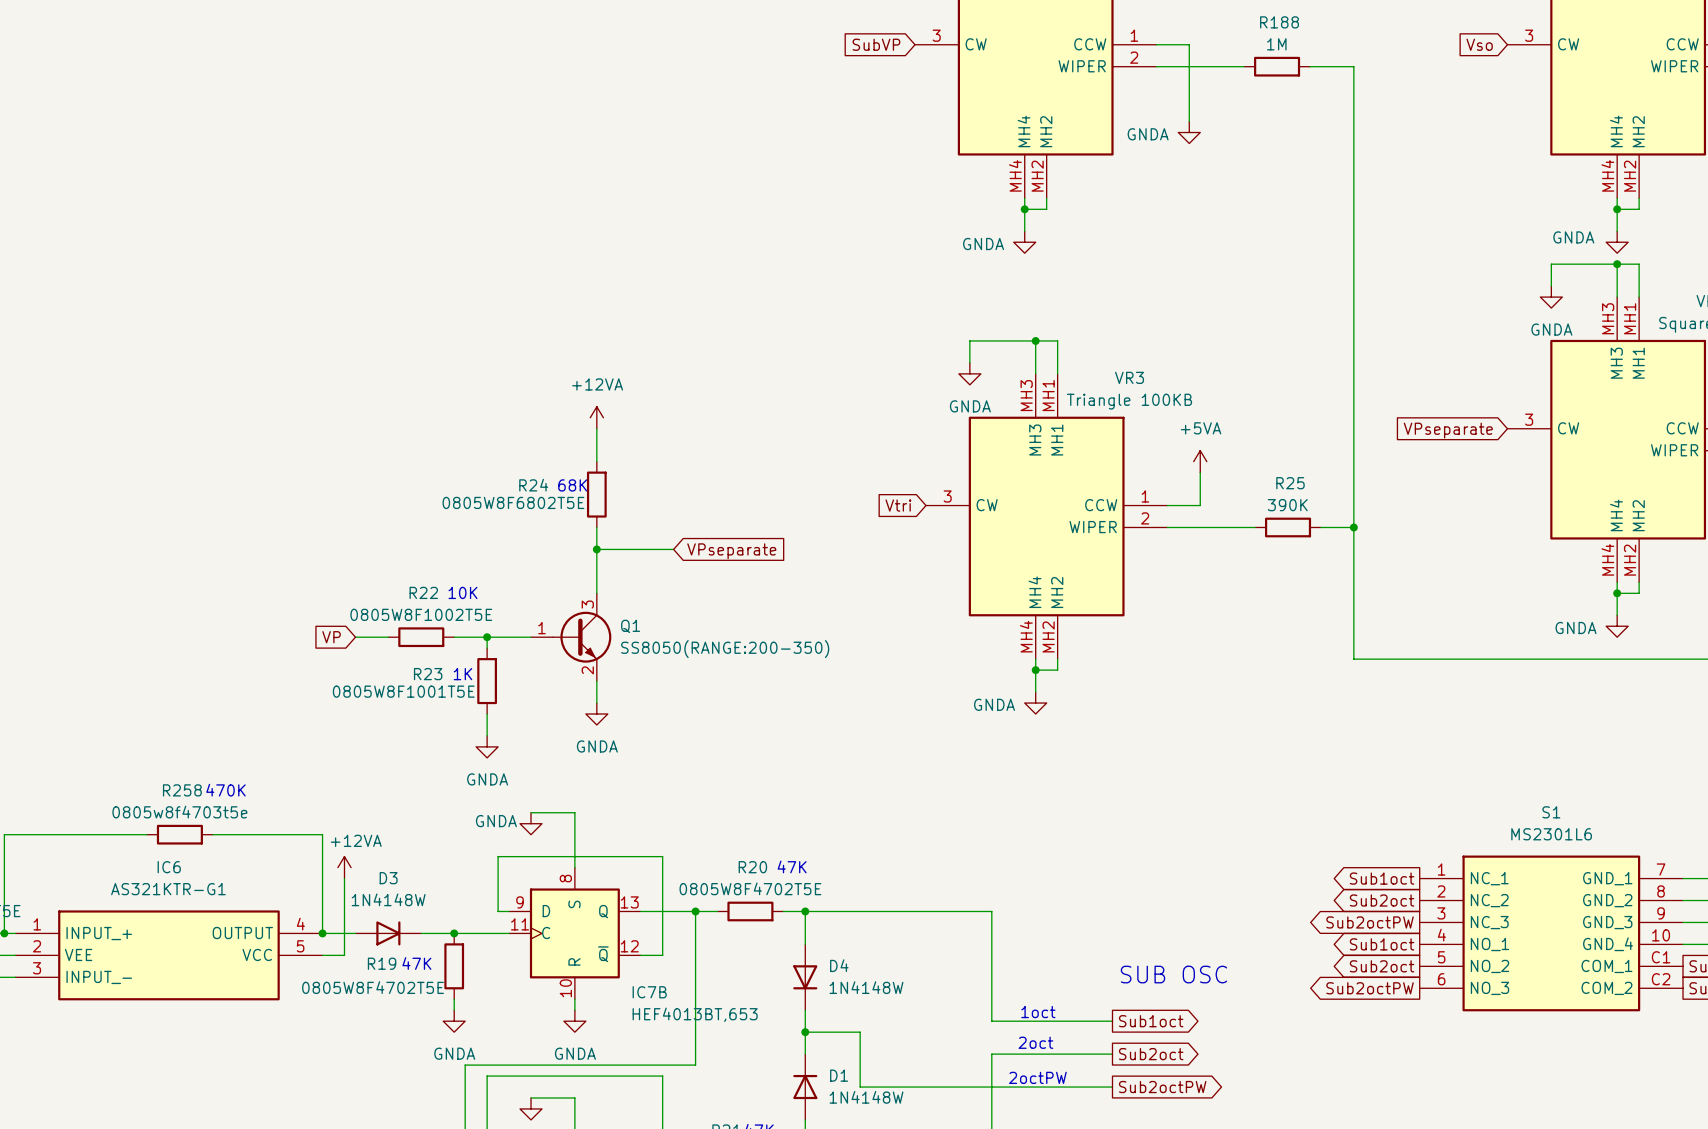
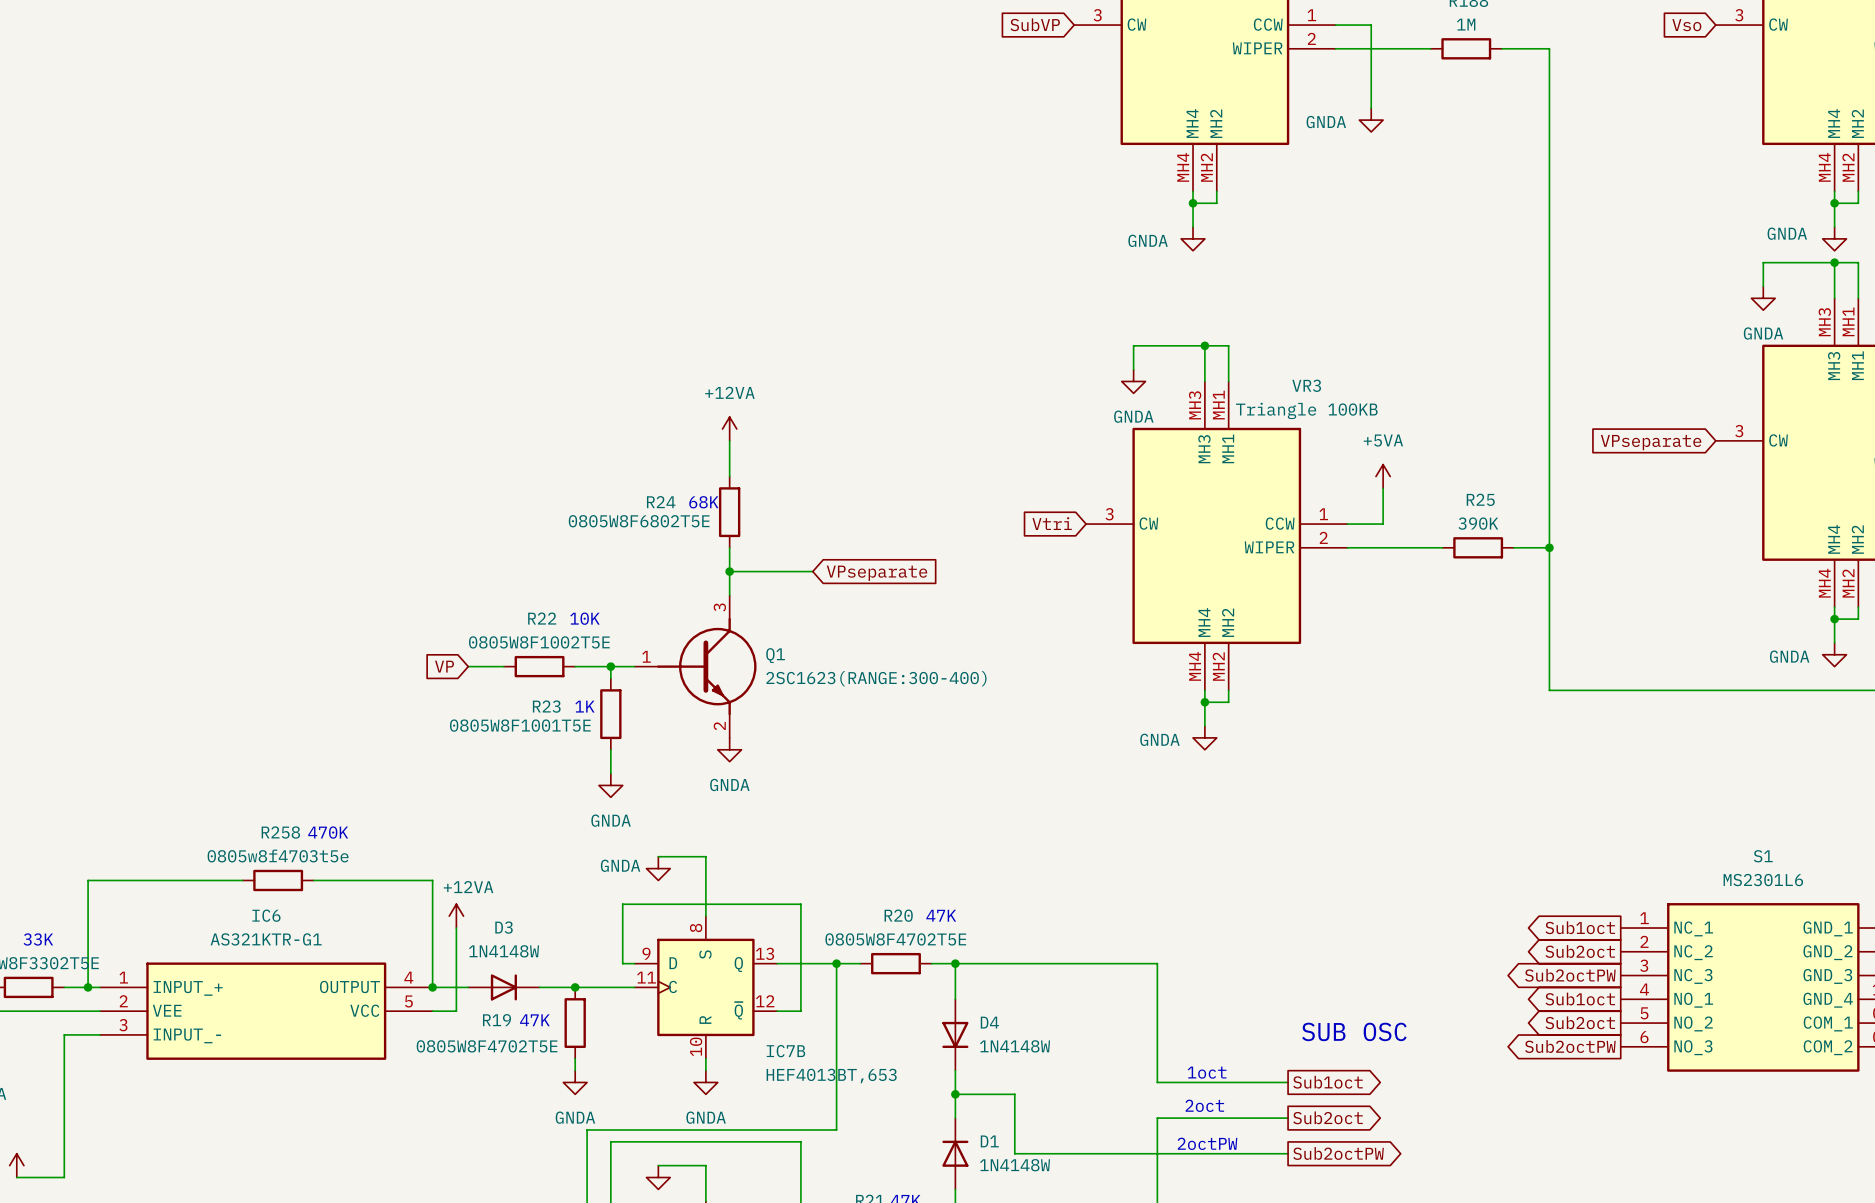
Q1 symbol: [531, 593, 612, 682] -> [634, 595, 757, 738]
Q1 value: SS8050(RANGE:200-350) (725, 649) -> 2SC1623(RANGE:300-400) (876, 678)

